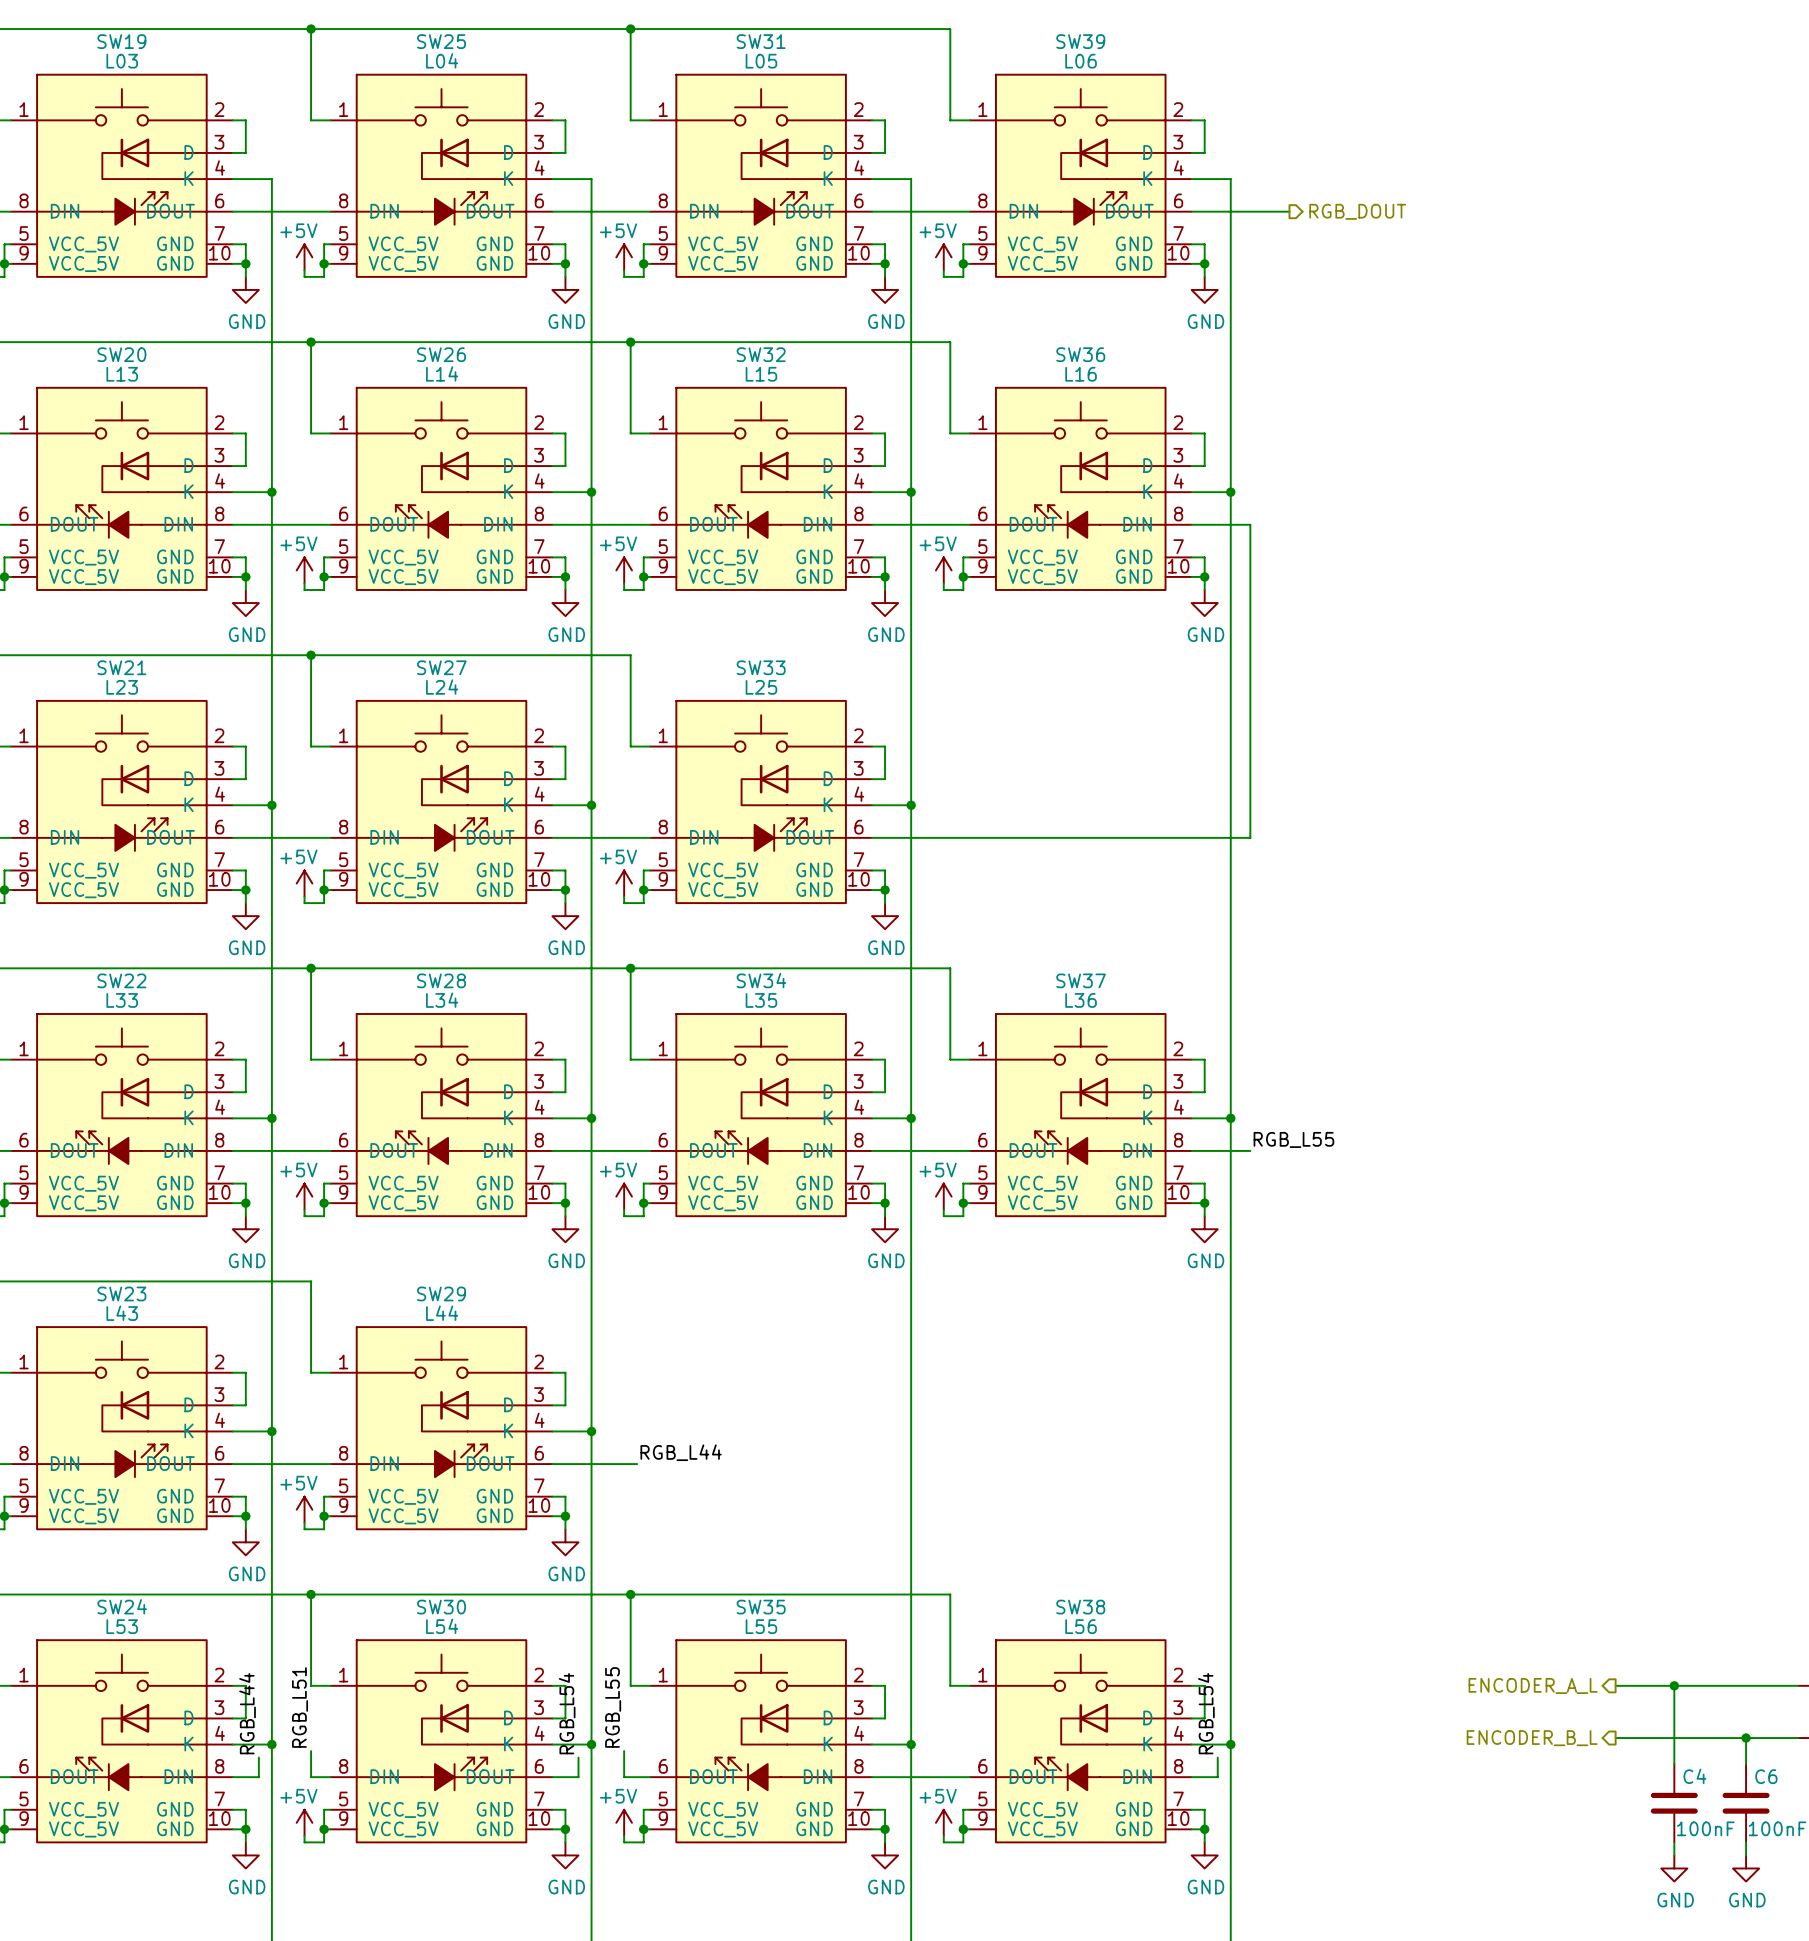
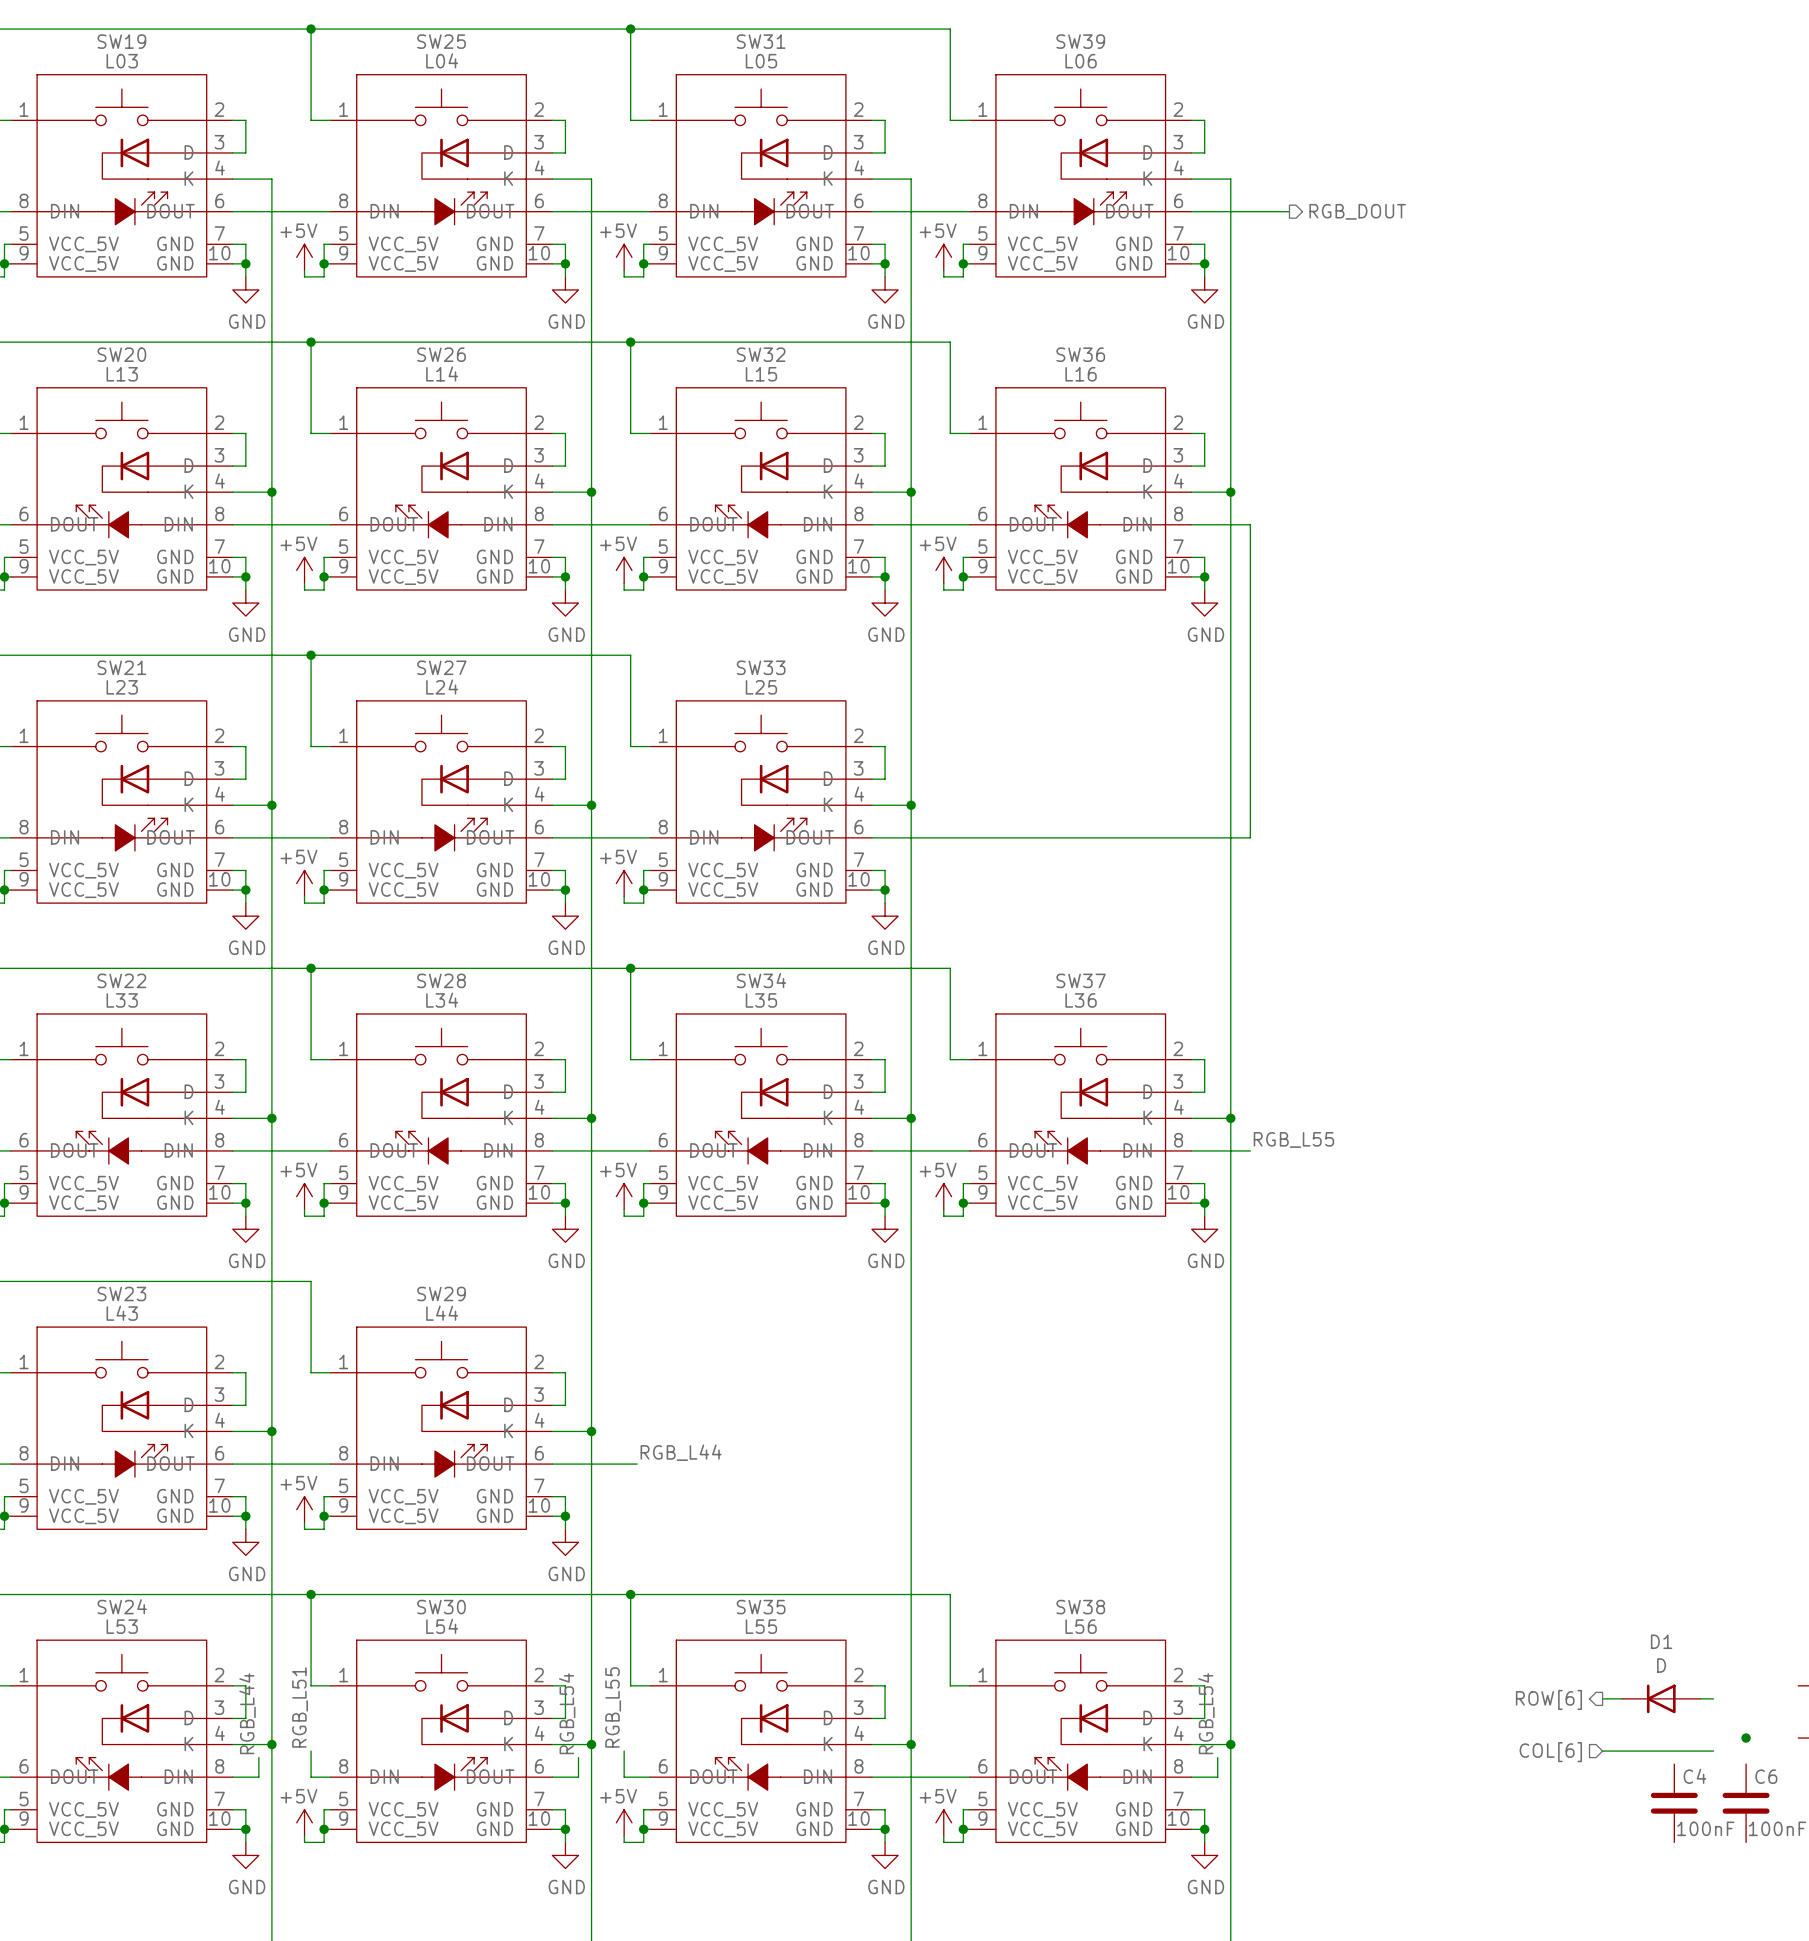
hierarchical label: ENCODER_A_L (1533, 1685) -> none
wire: (1615, 1685) (1798, 1685) -> none
wire: (1674, 1685) (1674, 1764) -> none
junction: (1674, 1685) -> none
wire: none -> (1602, 1698) (1622, 1698)
D1: none -> D (1661, 1698)
wire: none -> (1700, 1698) (1713, 1698)
hierarchical label: none -> ROW[6] (1548, 1699)
hierarchical label: ENCODER_B_L (1532, 1738) -> none
wire: (1615, 1738) (1798, 1738) -> none
wire: (1746, 1738) (1746, 1764) -> none
wire: none -> (1602, 1751) (1713, 1751)
hierarchical label: none -> COL[6] (1550, 1752)
wire: (1674, 1842) (1674, 1855) -> none
wire: (1746, 1842) (1746, 1855) -> none
power symbol: GND (1674, 1868) -> none
power symbol: GND (1746, 1868) -> none

